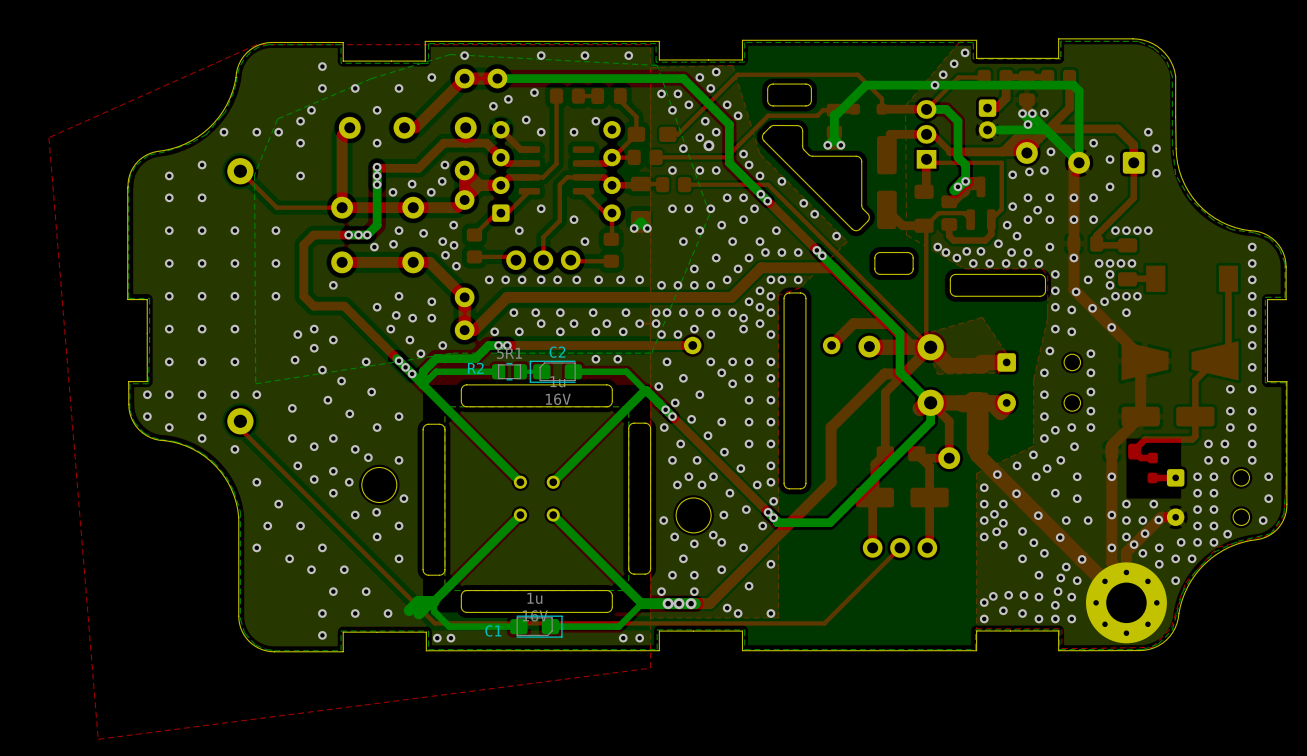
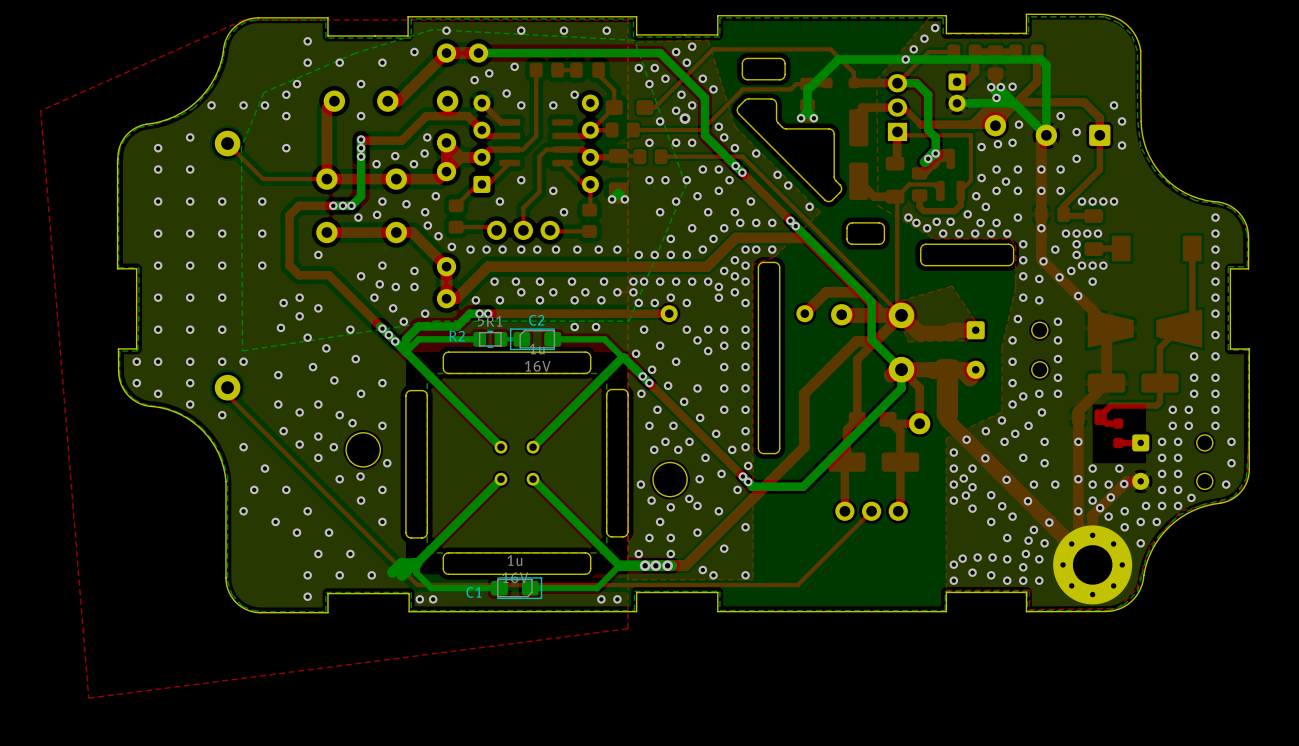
via position: (454, 245) -> (451, 246)

